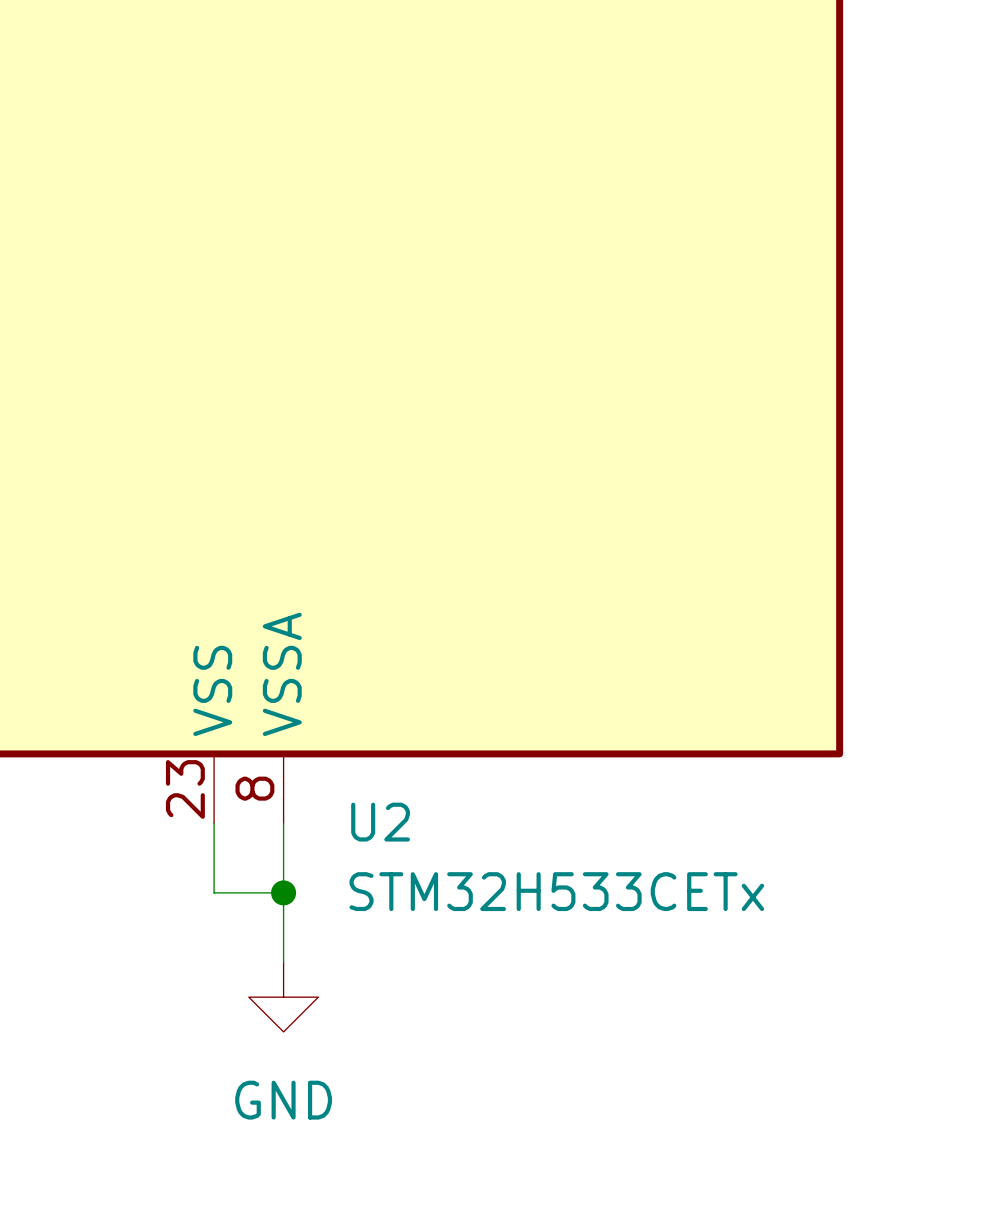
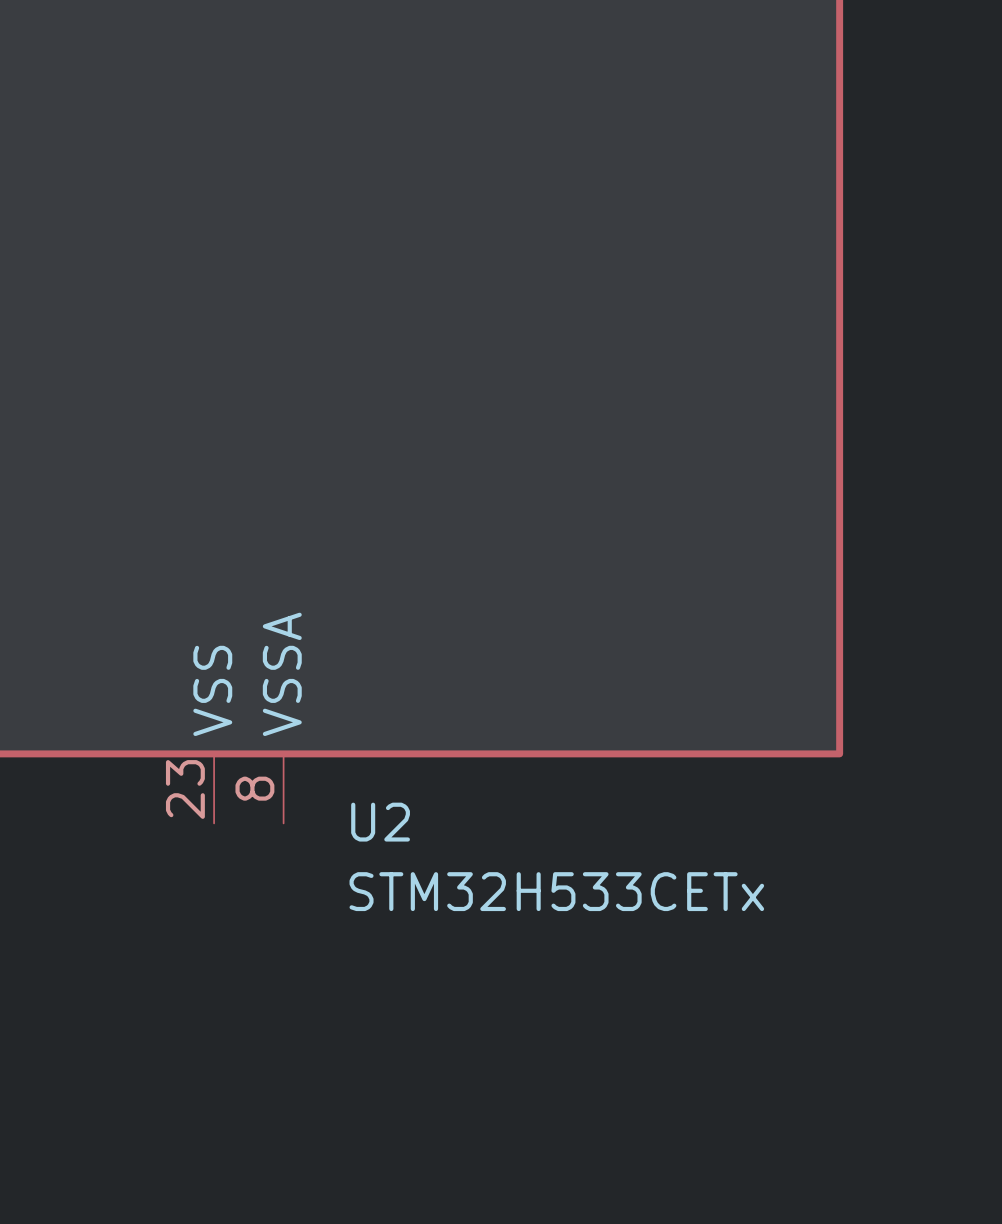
wire: (214, 823) (214, 892) (283, 892) -> none
wire: (283, 823) (283, 962) -> none
junction: (283, 892) -> none
power symbol: GND (283, 997) -> none

